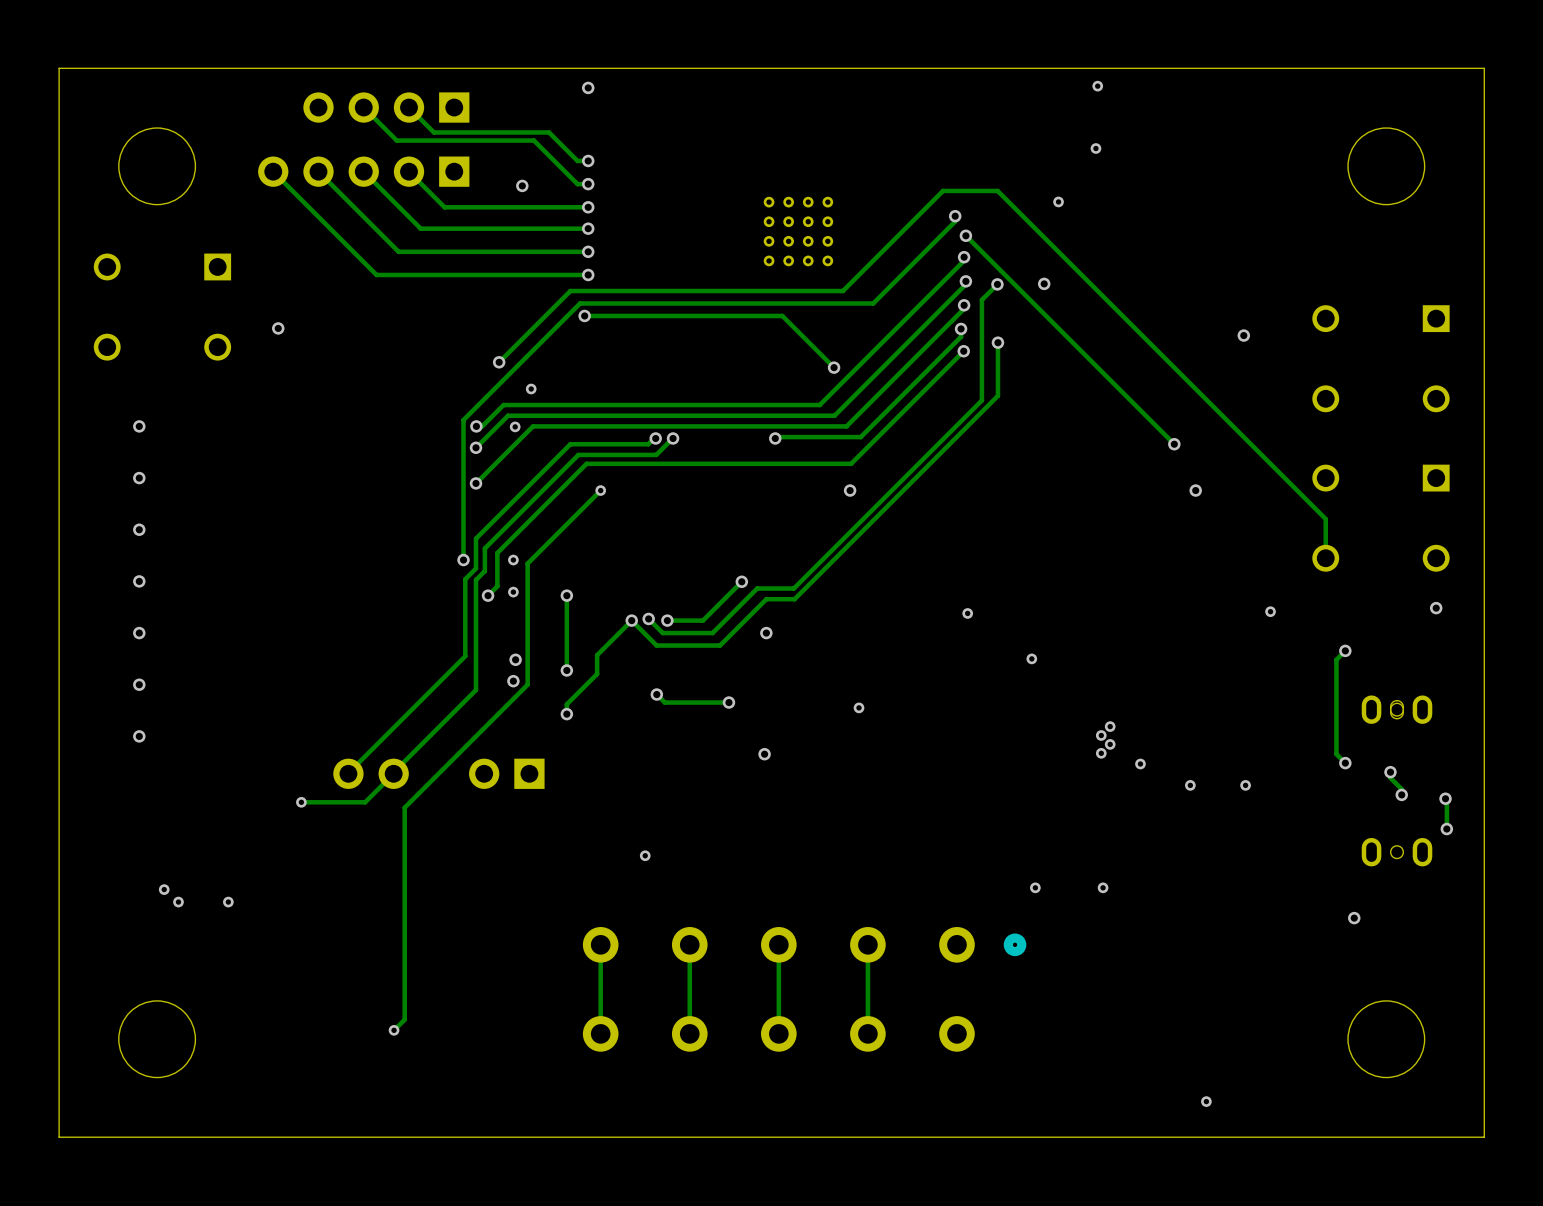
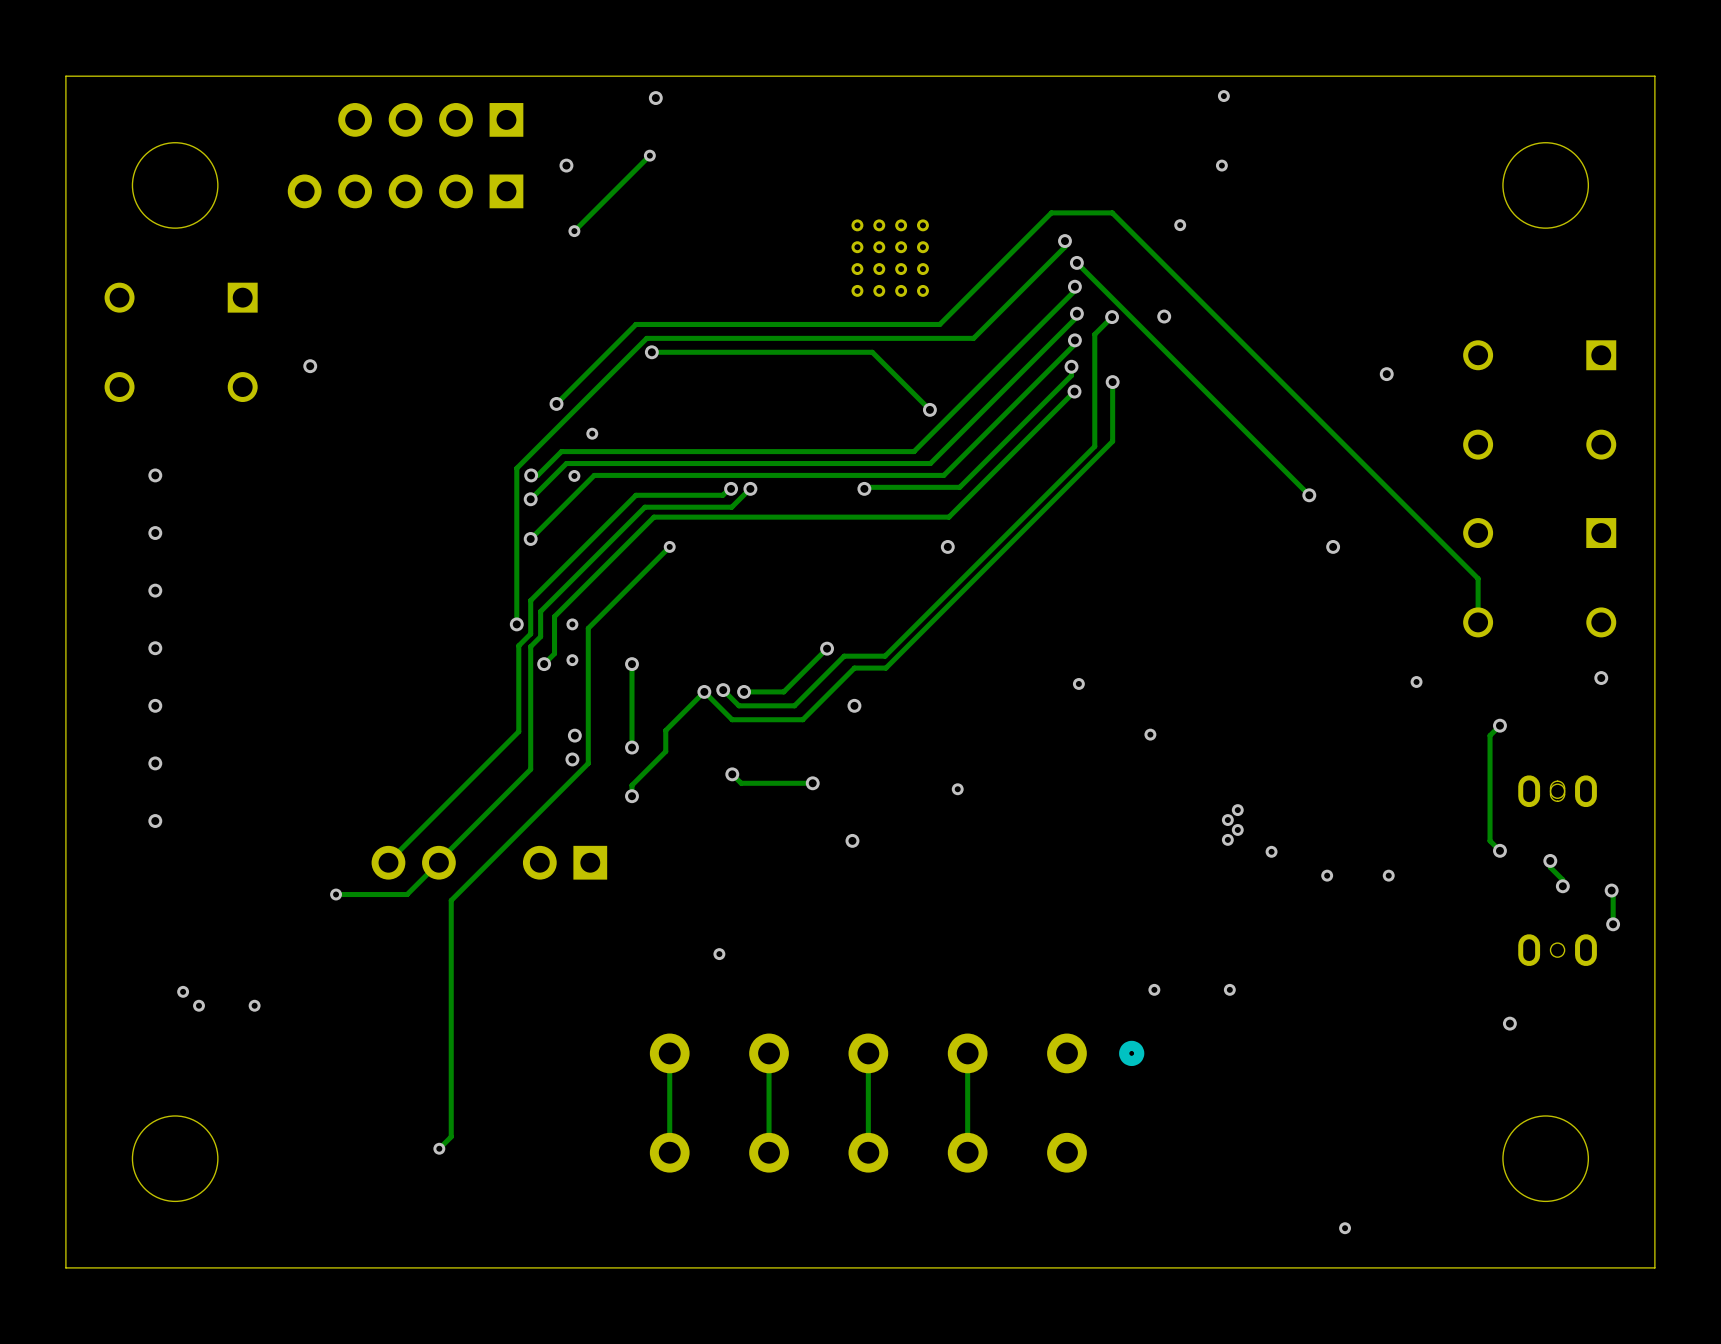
track: (363, 107) (396, 140) (533, 140) (577, 184) (588, 184) -> none
track: (409, 107) (433, 132) (549, 132) (577, 160) (588, 160) -> none
track: none -> (649, 155) (574, 231)
via: none -> (649, 155)
via: (588, 160) -> none
track: (273, 171) (376, 274) (588, 274) -> none
track: (318, 171) (398, 251) (588, 251) -> none
track: (363, 171) (420, 228) (588, 228) -> none
track: (409, 171) (444, 207) (588, 207) -> none
via: (588, 184) -> none
via position: (522, 185) -> (566, 165)
via: none -> (574, 231)
via: (588, 207) -> none
via: (588, 228) -> none
via: (588, 251) -> none
via: (588, 274) -> none

